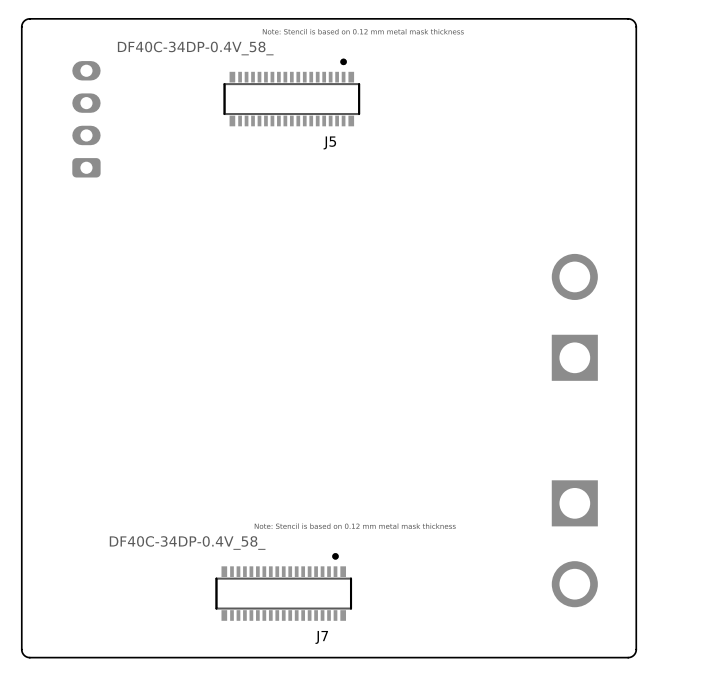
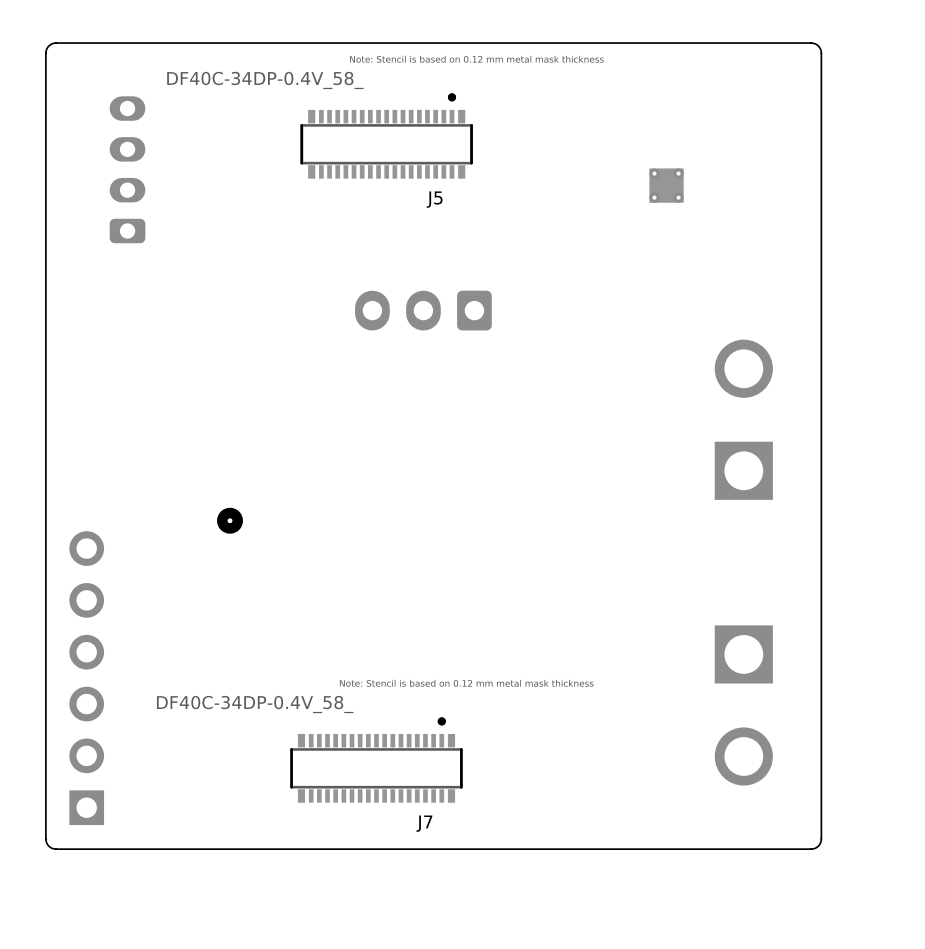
part: none -> (666, 185)
part: none -> (423, 310)
part: none -> (229, 520)
part: none -> (86, 678)

